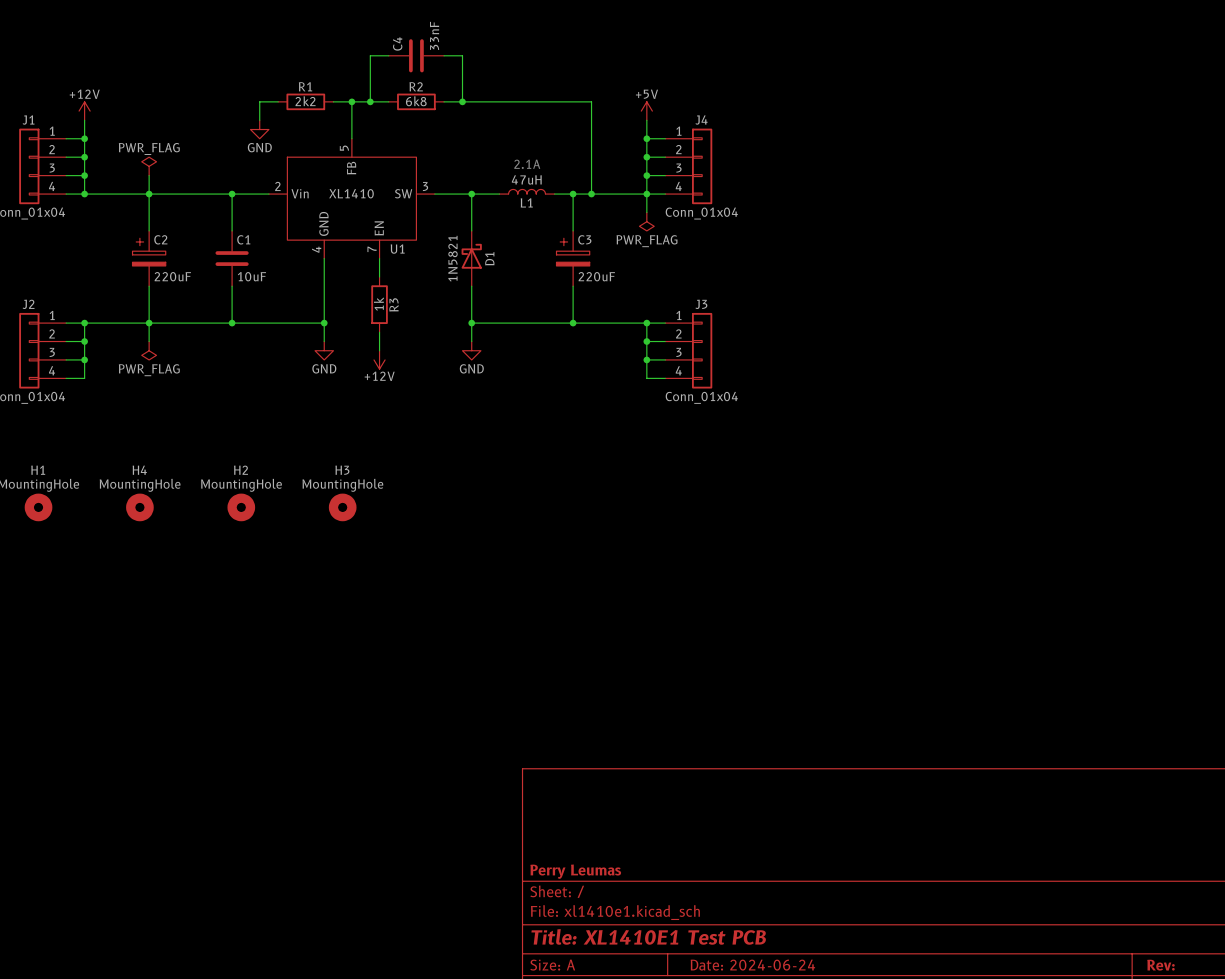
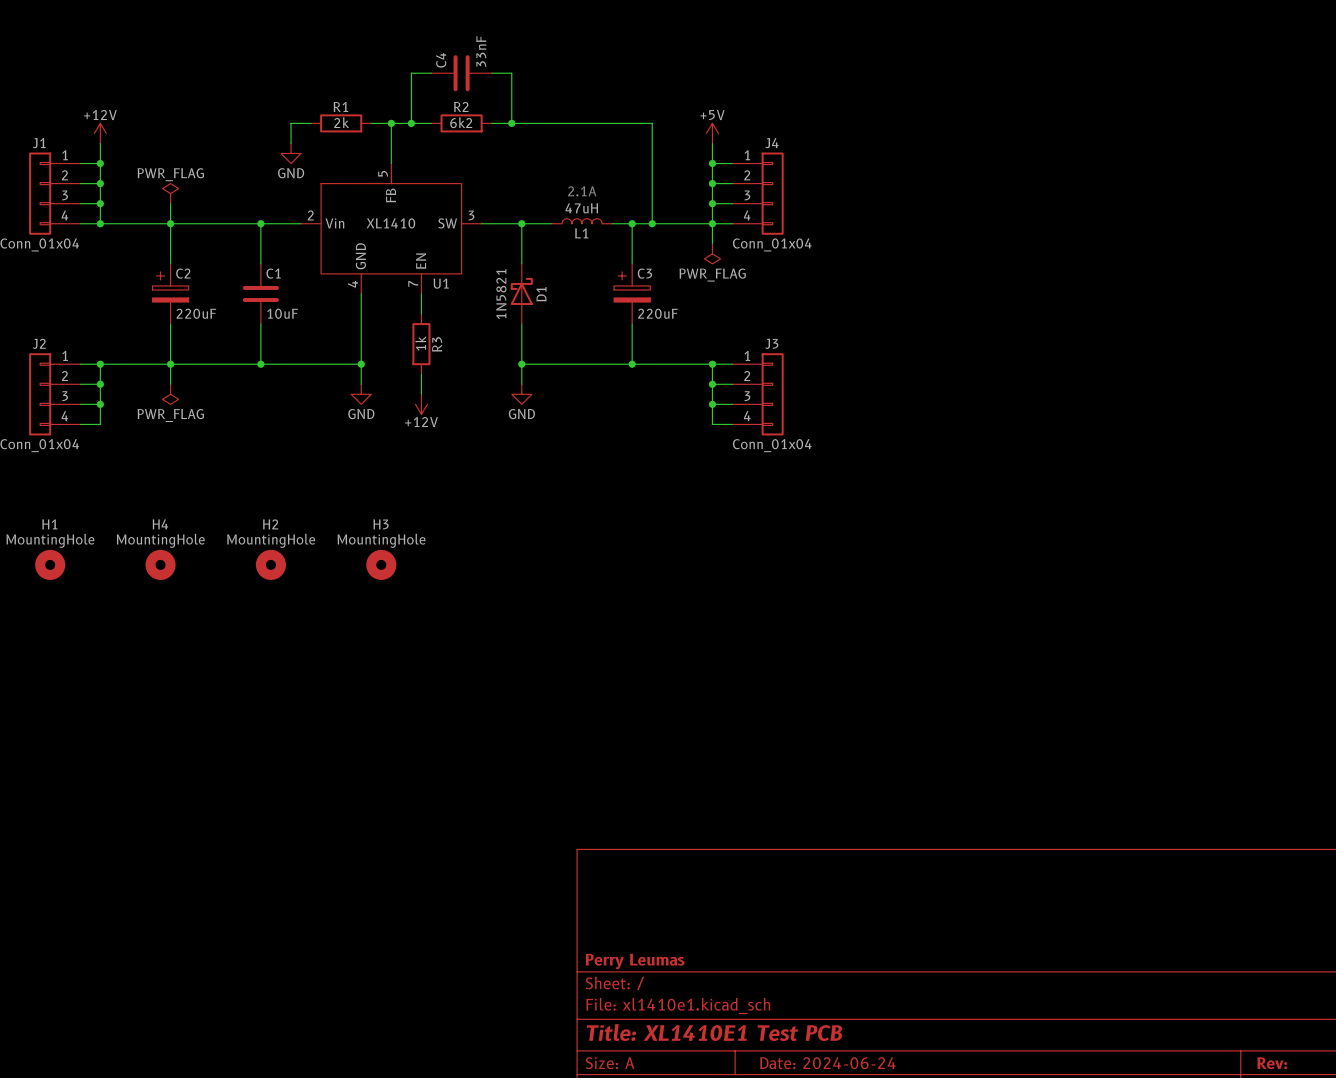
R1 value: 2k2 (305, 101) -> 2k (341, 122)
R2 value: 6k8 (416, 101) -> 6k2 (461, 122)

